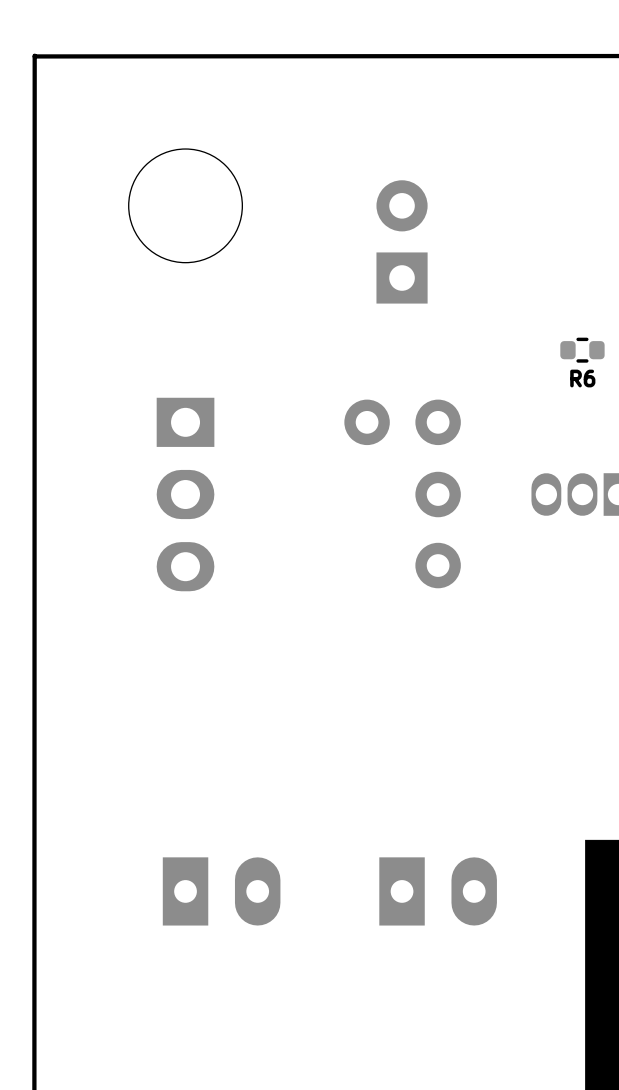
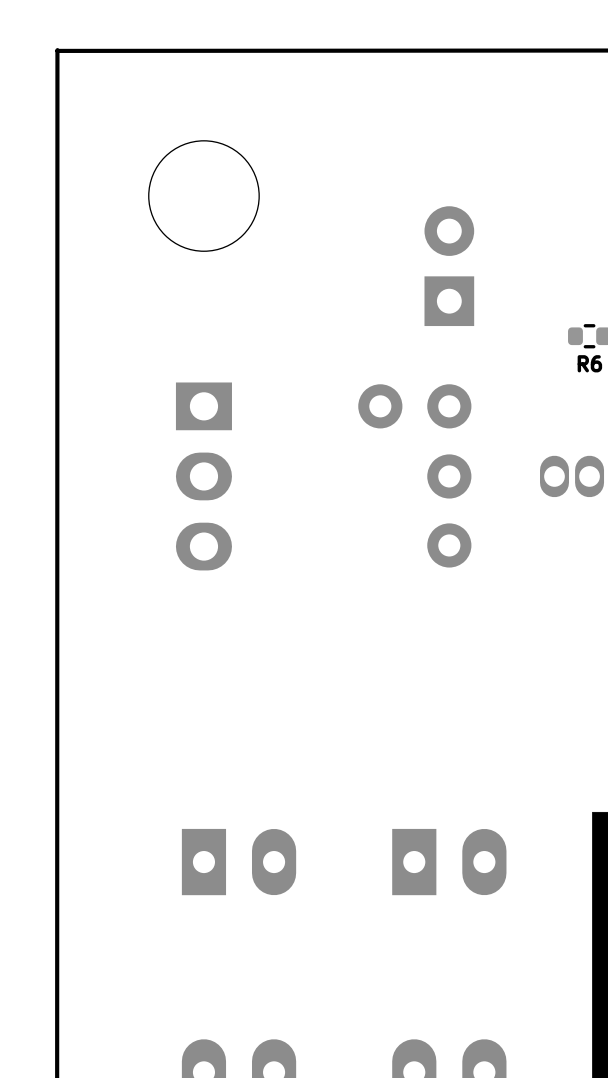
part position: (402, 241) -> (449, 266)

